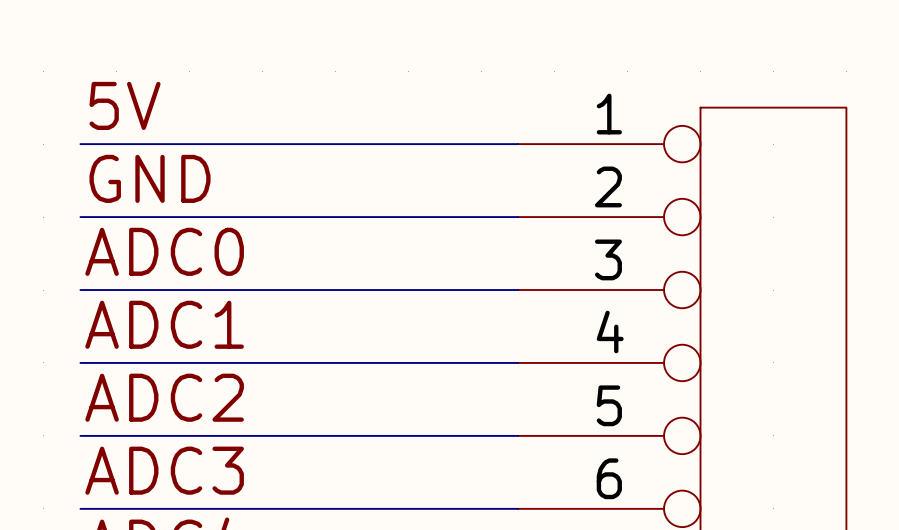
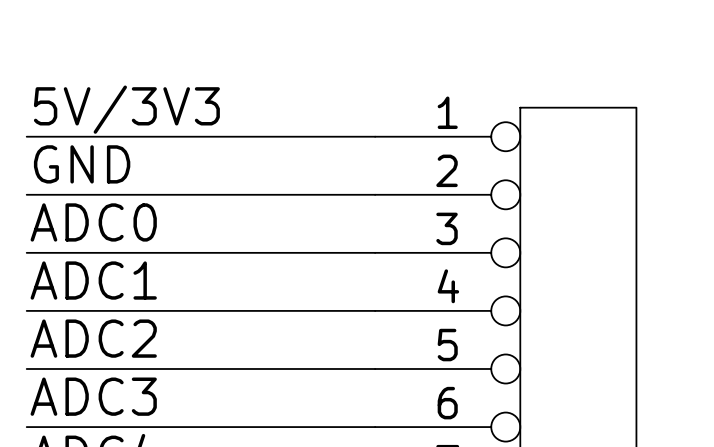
label: 5V (125, 105) -> 5V/3V3 (126, 109)

